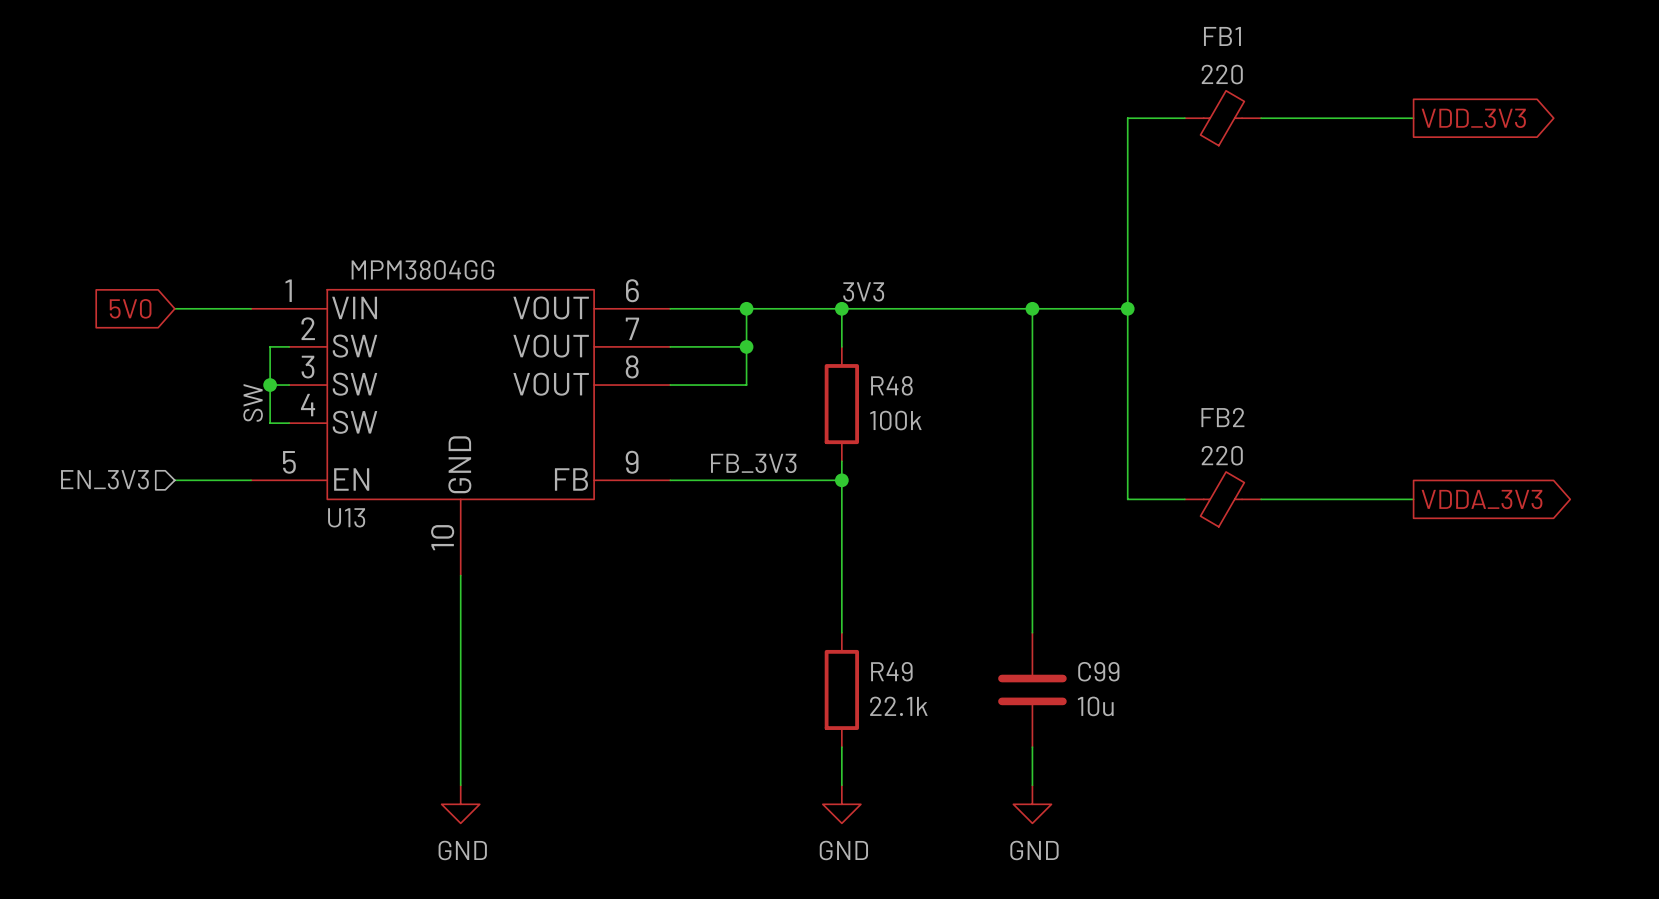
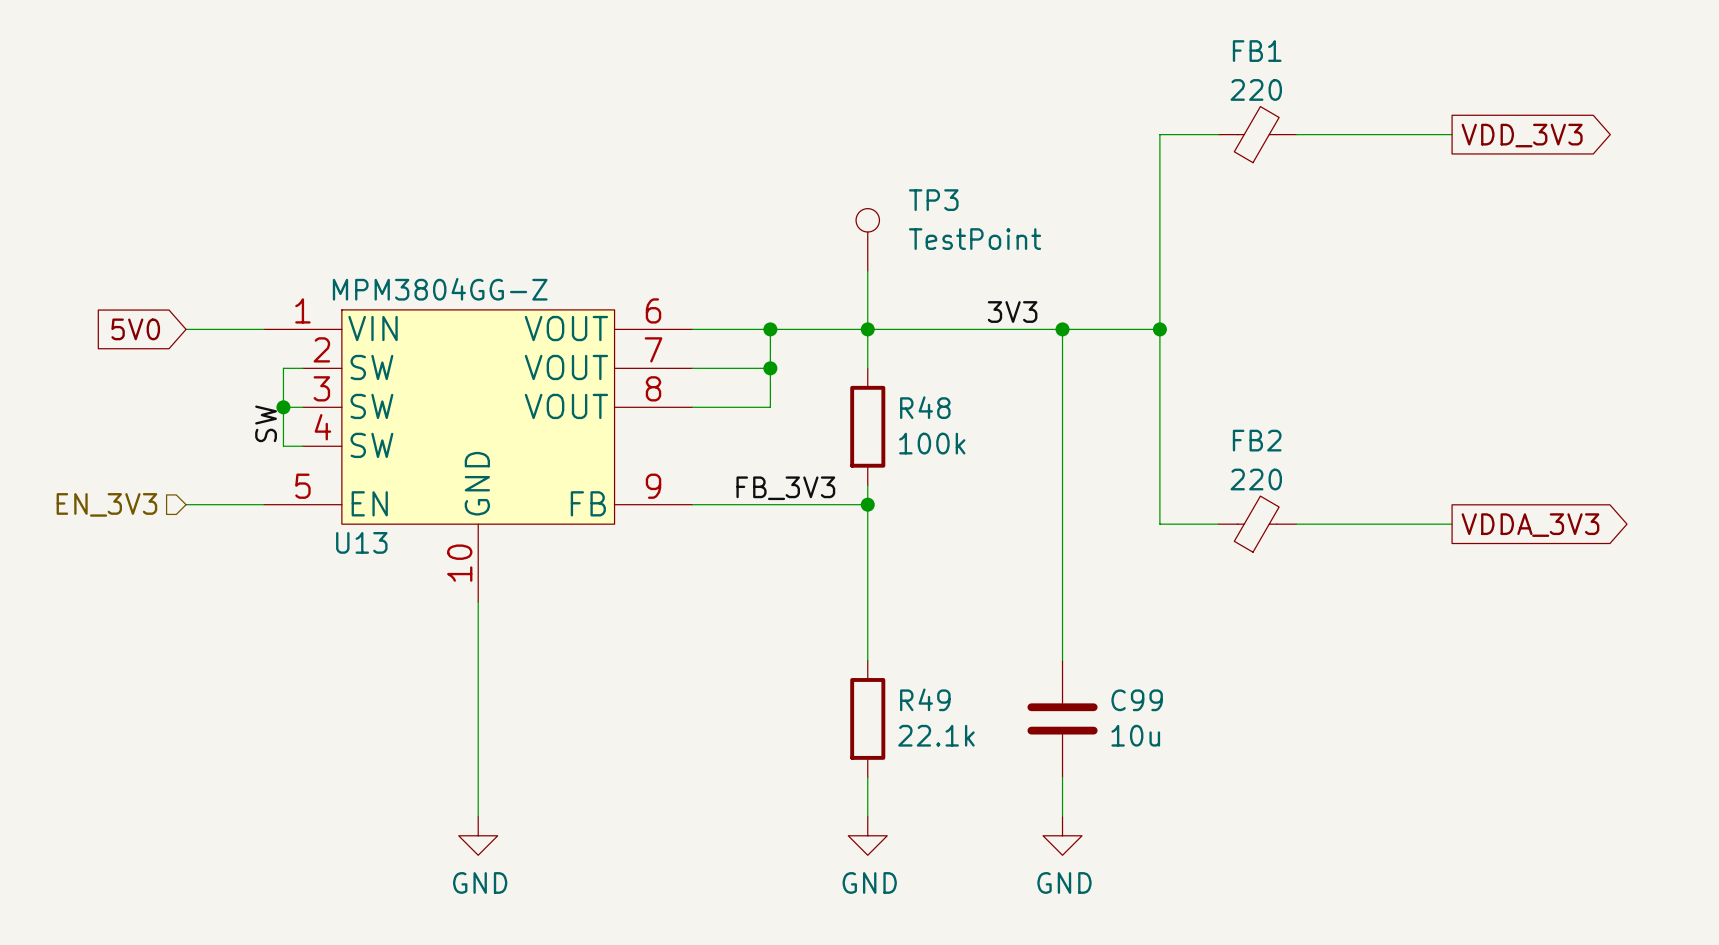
TP3: none -> TestPoint (867, 239)
wire: none -> (867, 270) (867, 329)
U13 value: MPM3804GG (422, 269) -> MPM3804GG-Z (440, 289)
label position: 3V3 (863, 291) -> 3V3 (1012, 312)

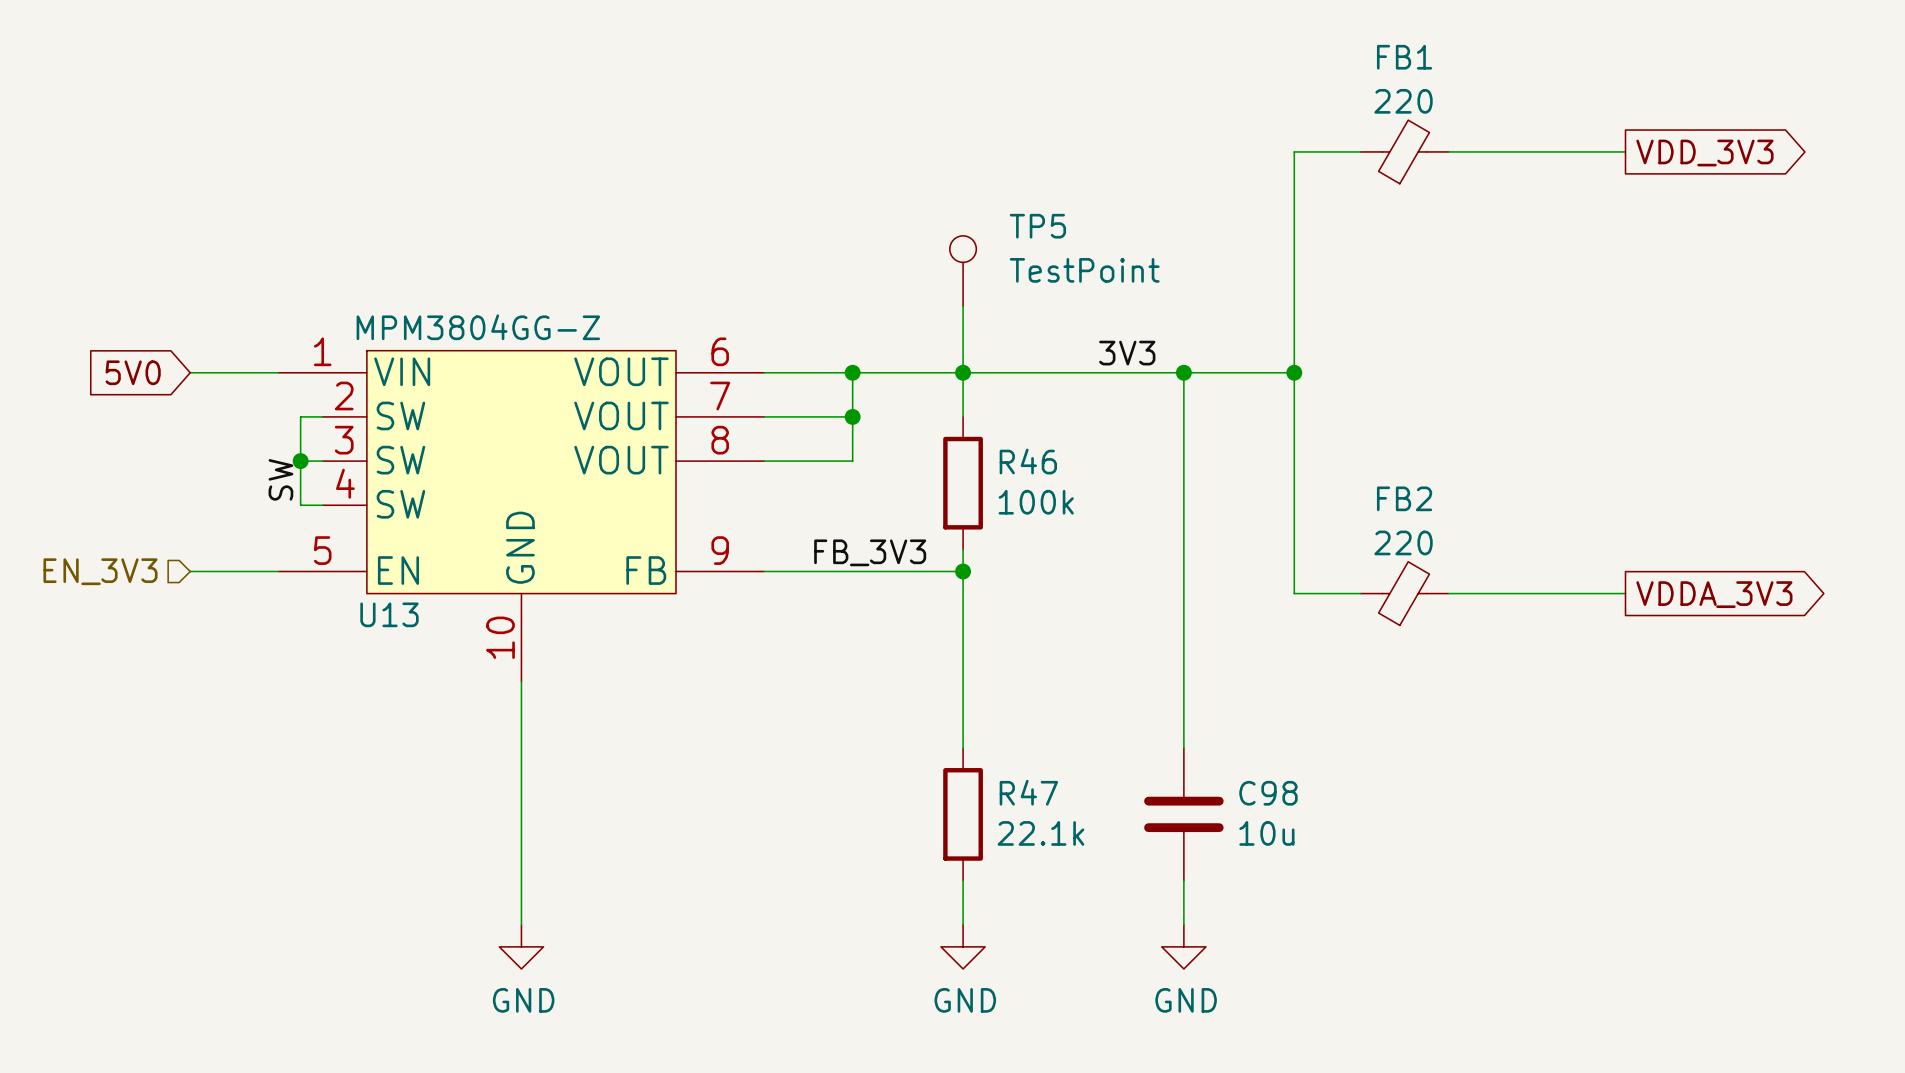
TP3 name: TP3 (933, 200) -> TP5 (1037, 226)
R48 name: R48 (925, 407) -> R46 (1028, 461)
R49 name: R49 (925, 699) -> R47 (1028, 792)
C99 name: C99 (1137, 700) -> C98 (1268, 793)

